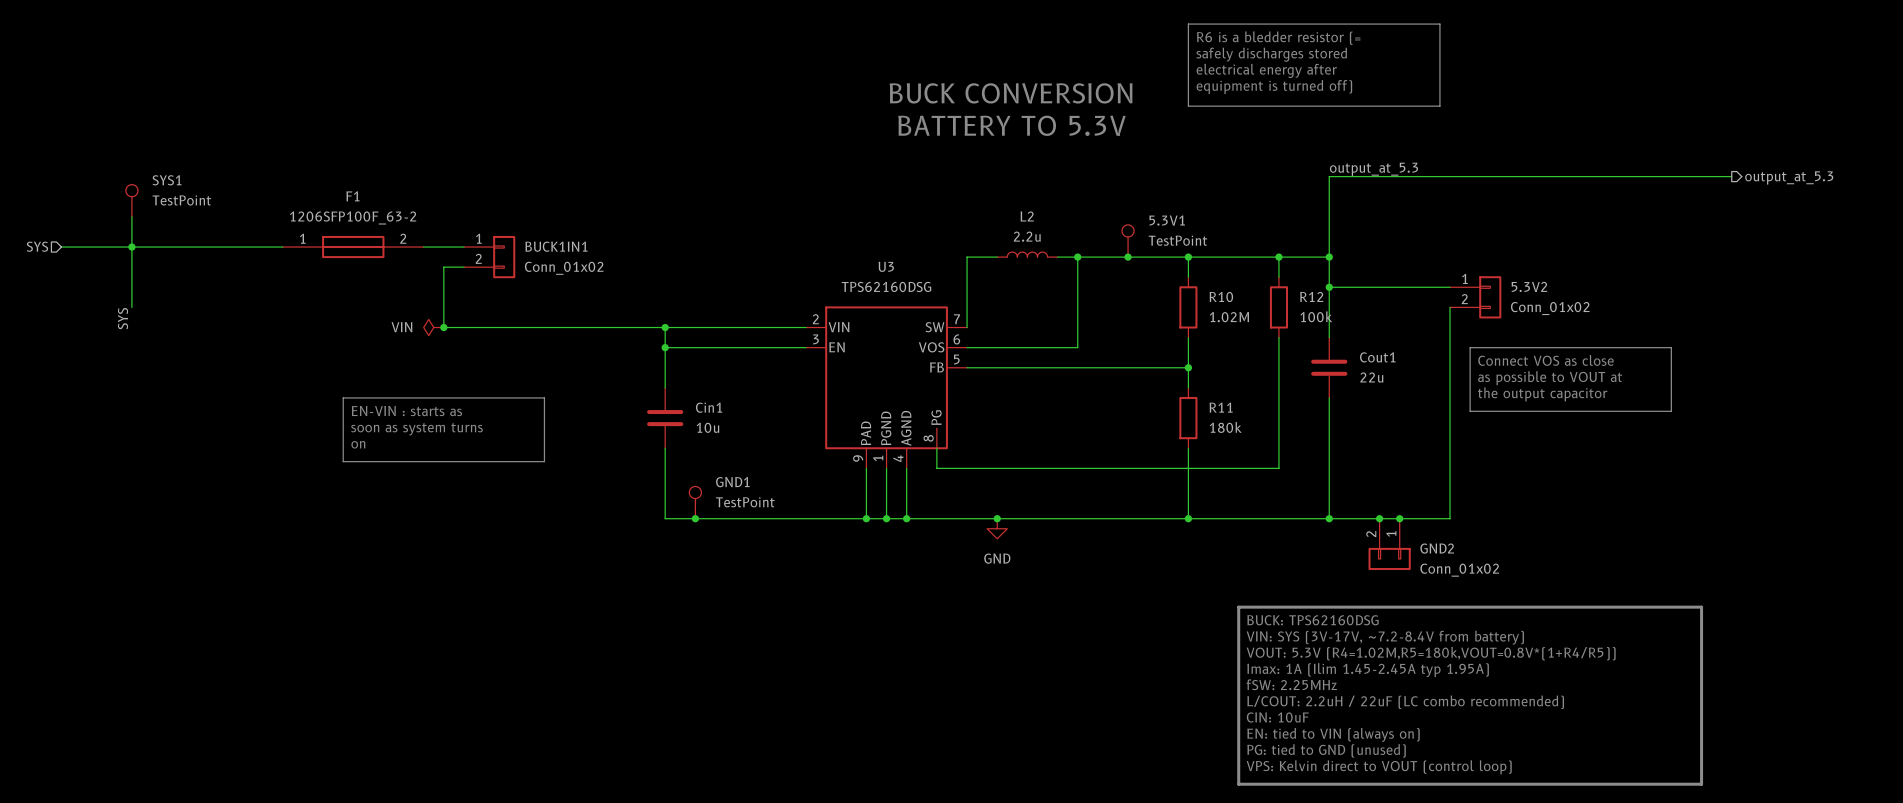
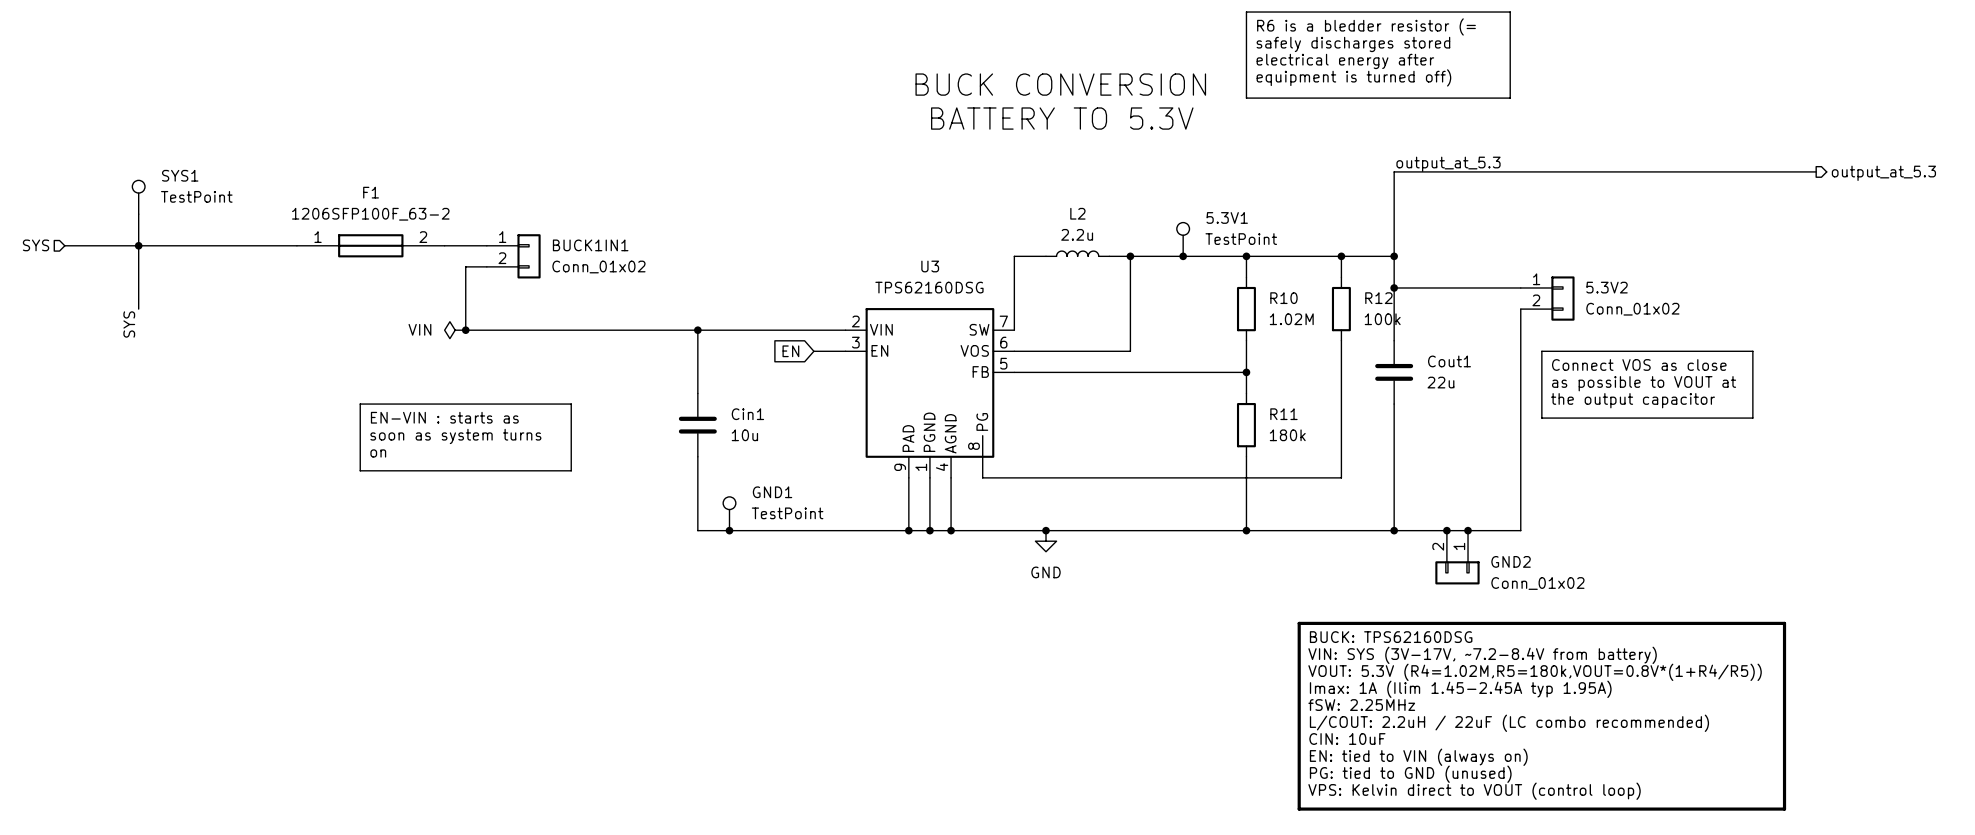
wire: (665, 347) (775, 347) -> none
junction: (665, 347) -> none
global label: none -> EN (790, 351)

